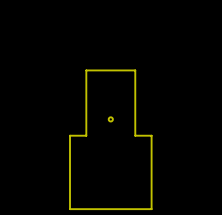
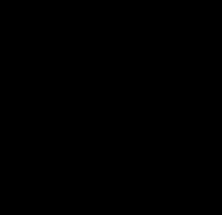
board edge: (135, 70) (135, 135) (151, 135) (151, 209) (70, 209) (70, 135) (86, 135) (86, 70) (135, 70) -> none
part: (110, 119) -> none

